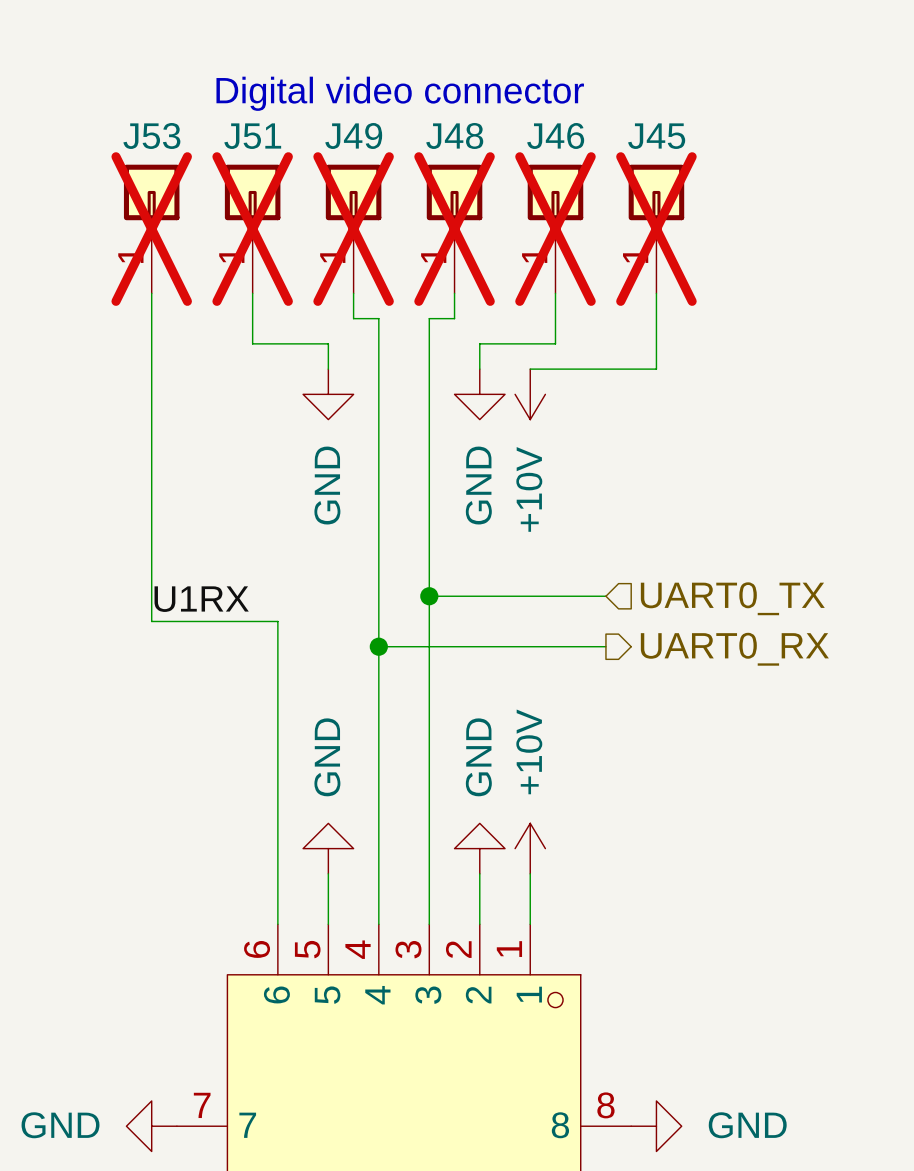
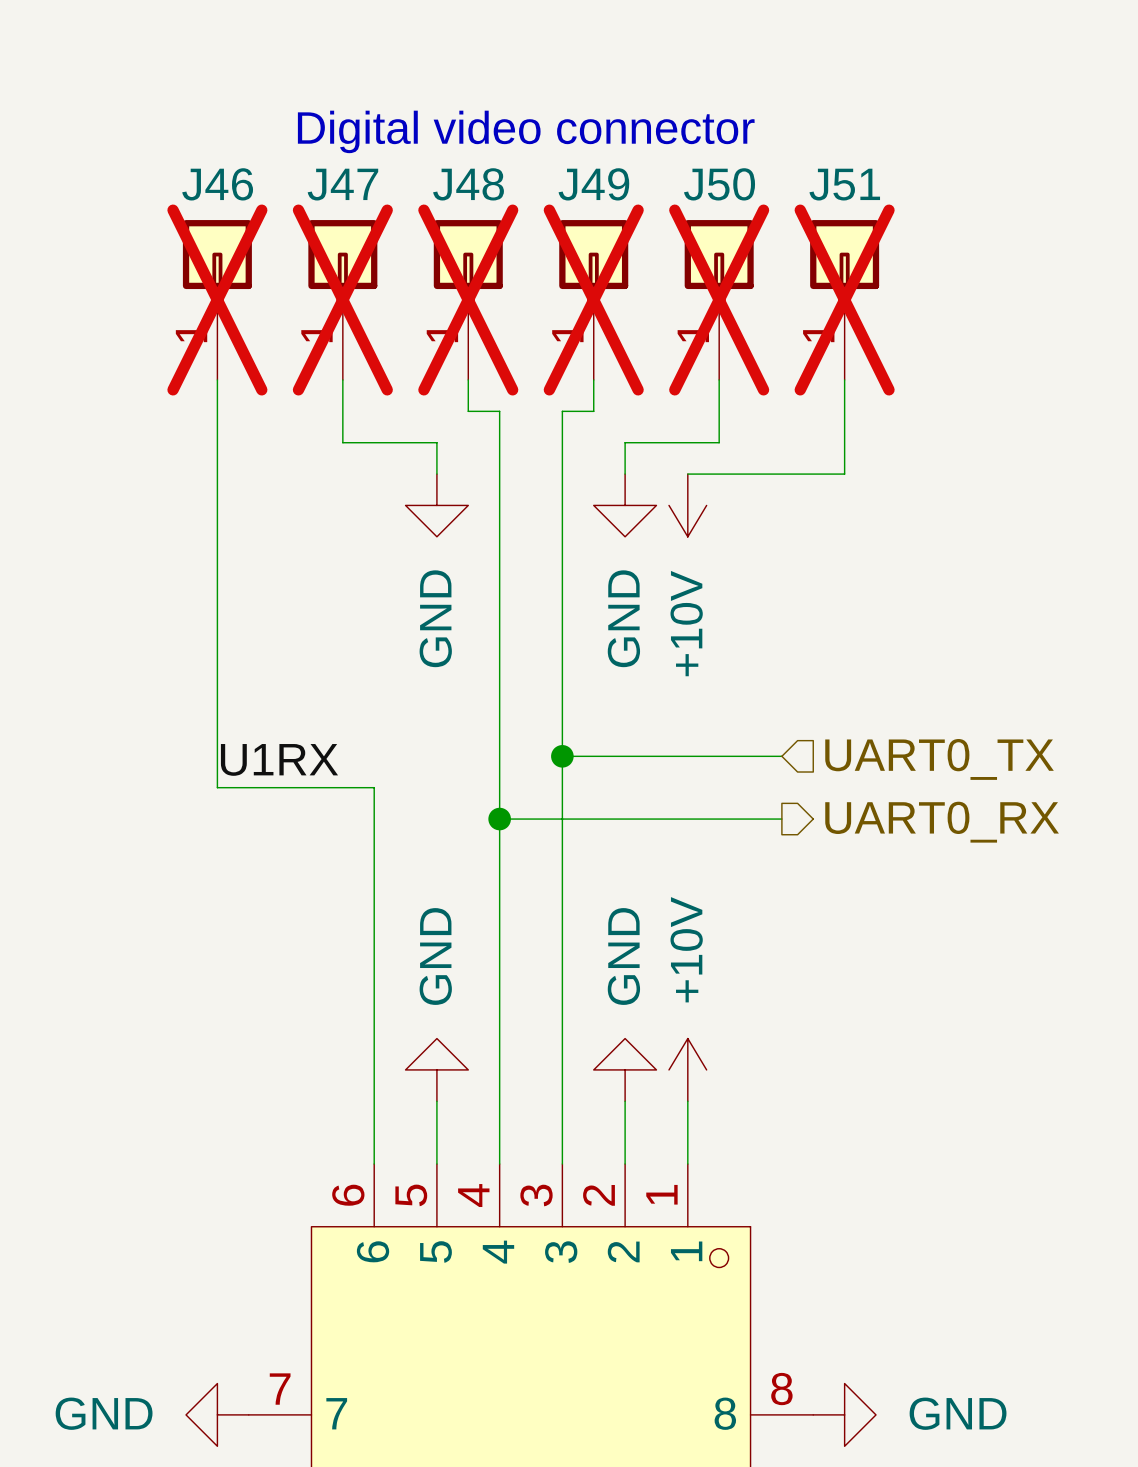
J53 name: J53 (151, 135) -> J46 (217, 184)
J49 name: J49 (353, 135) -> J48 (468, 184)
J48 name: J48 (454, 135) -> J49 (593, 184)
J46 name: J46 (555, 135) -> J50 (719, 184)
J51 name: J51 (252, 136) -> J47 (342, 184)
J45 name: J45 (656, 136) -> J51 (844, 184)

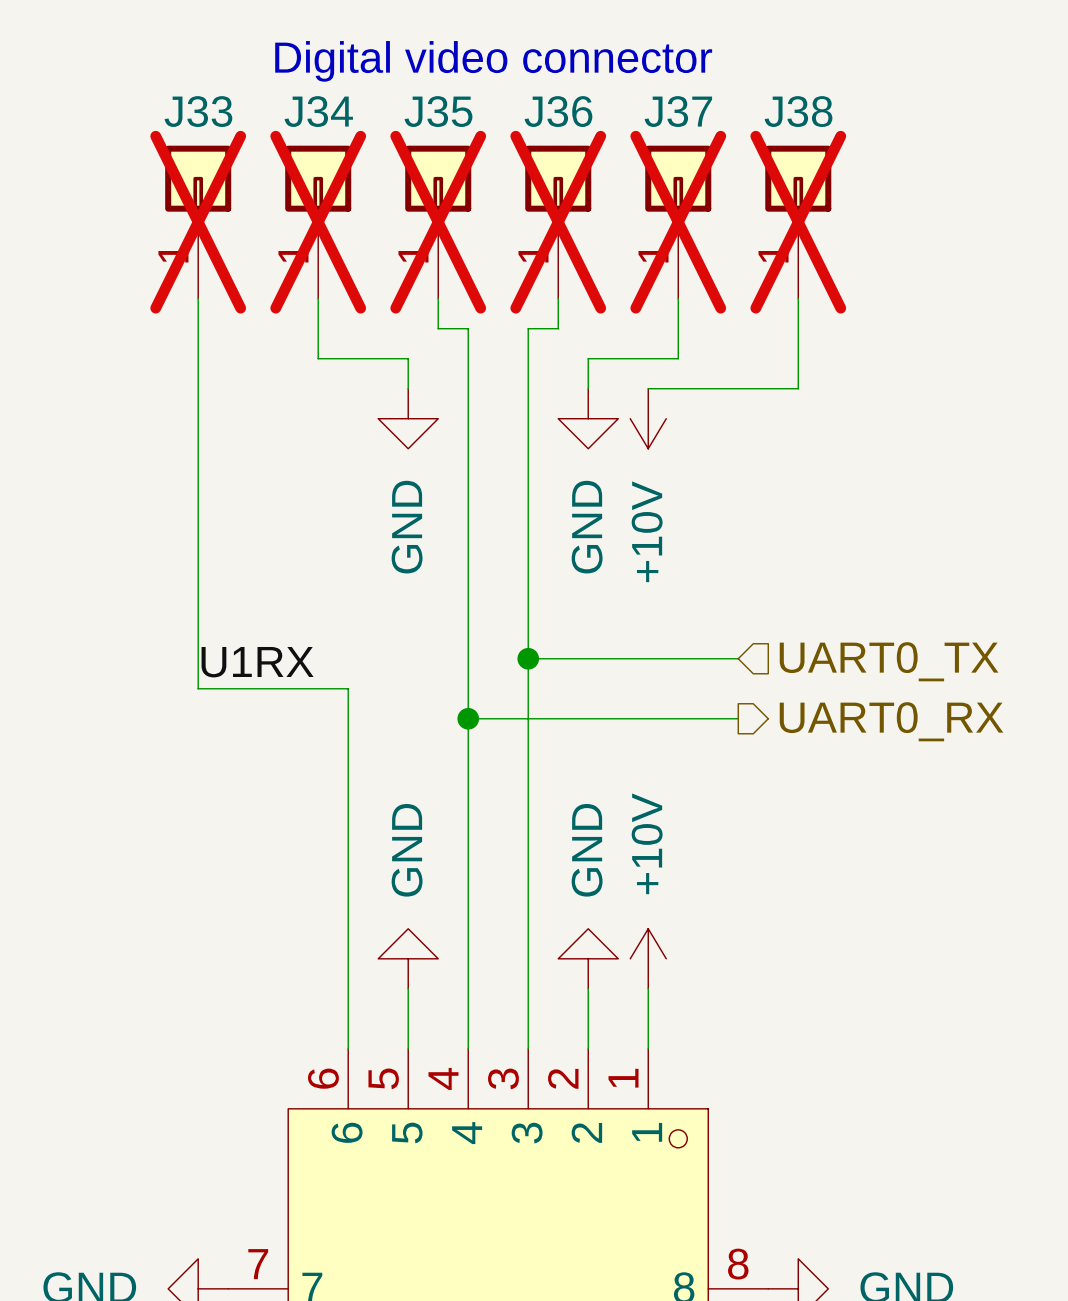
J46 name: J46 (217, 184) -> J33 (198, 111)
J47 name: J47 (342, 184) -> J34 (318, 111)
J48 name: J48 (468, 184) -> J35 (438, 111)
J49 name: J49 (593, 184) -> J36 (558, 111)
J50 name: J50 (719, 184) -> J37 (678, 111)
J51 name: J51 (844, 184) -> J38 (798, 111)

